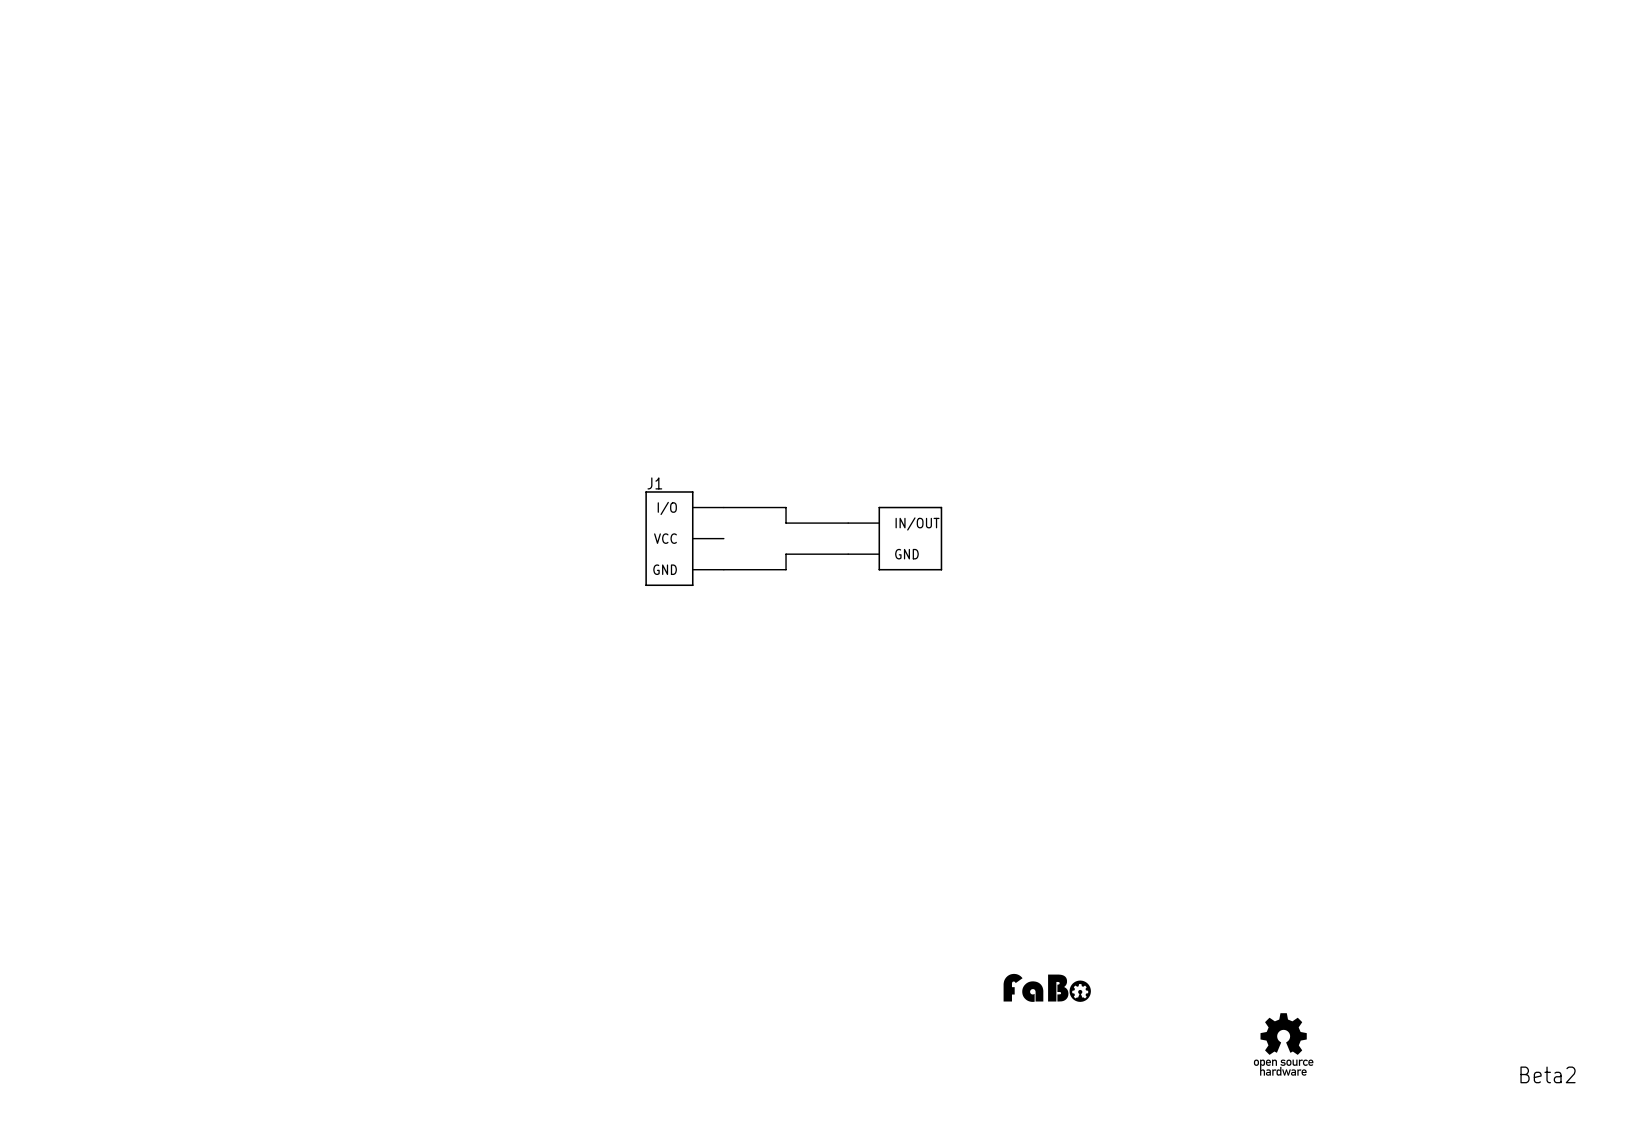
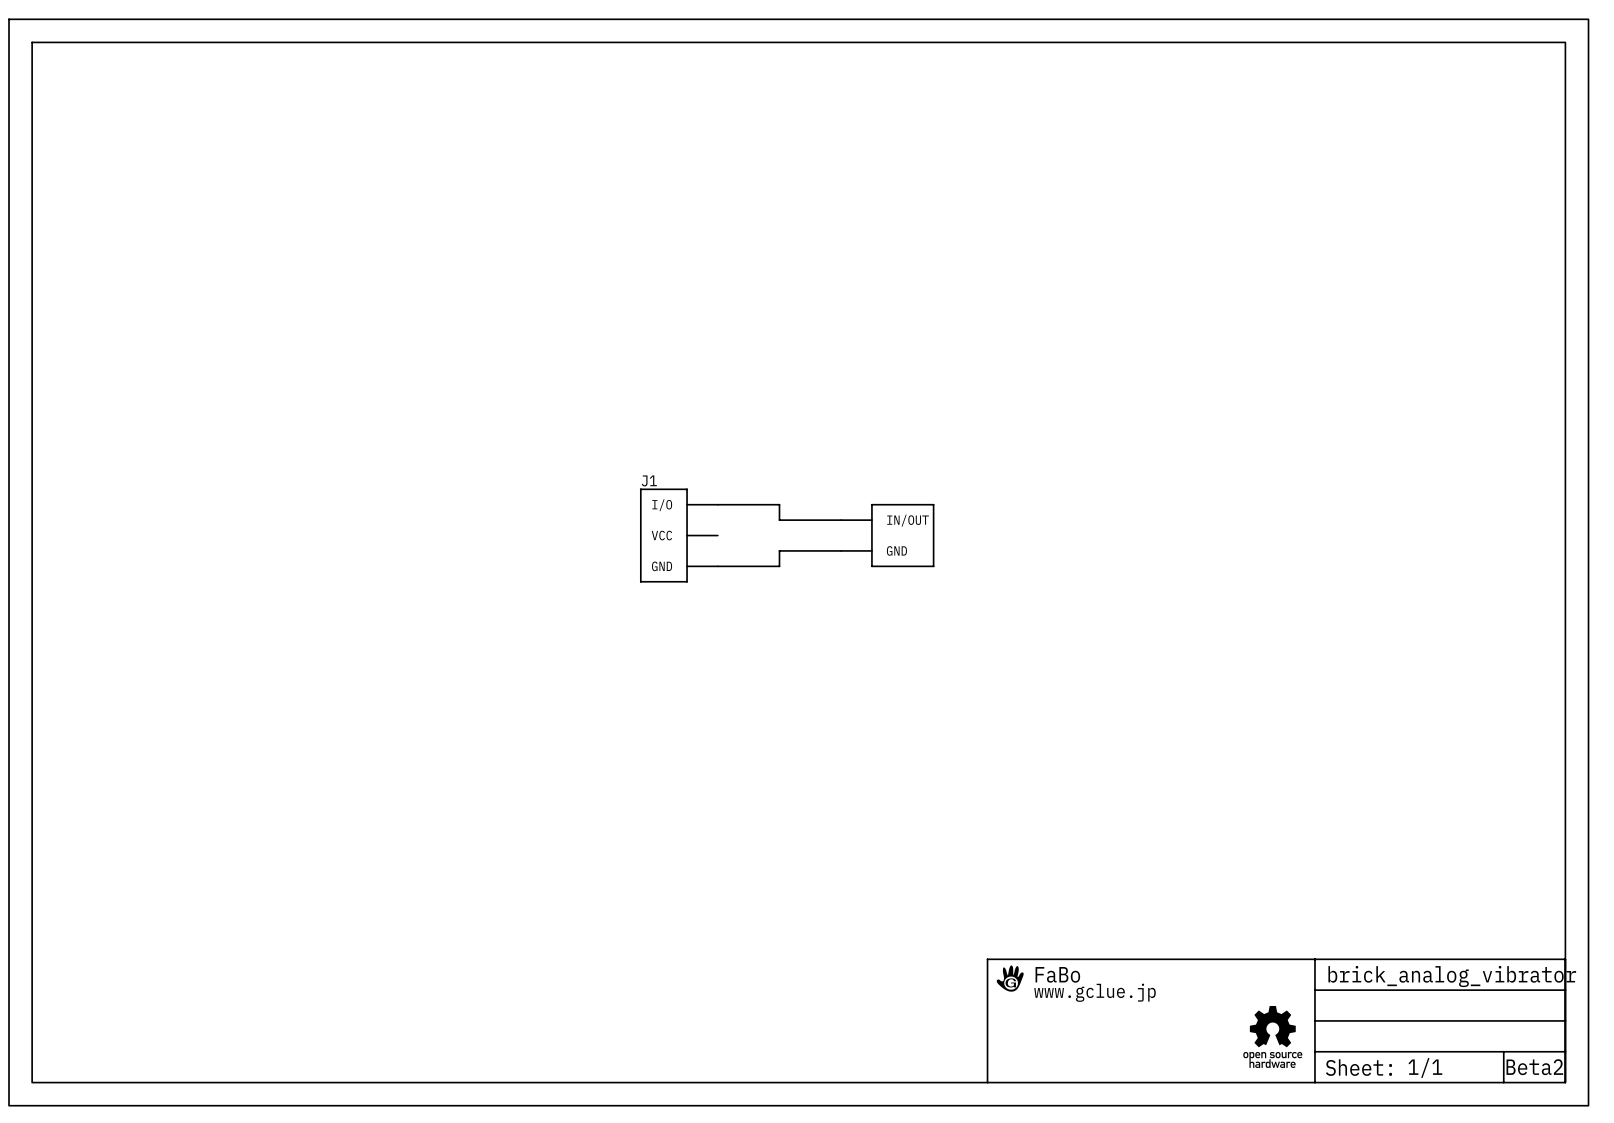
part: none -> (798, 562)
part: (1047, 987) -> none

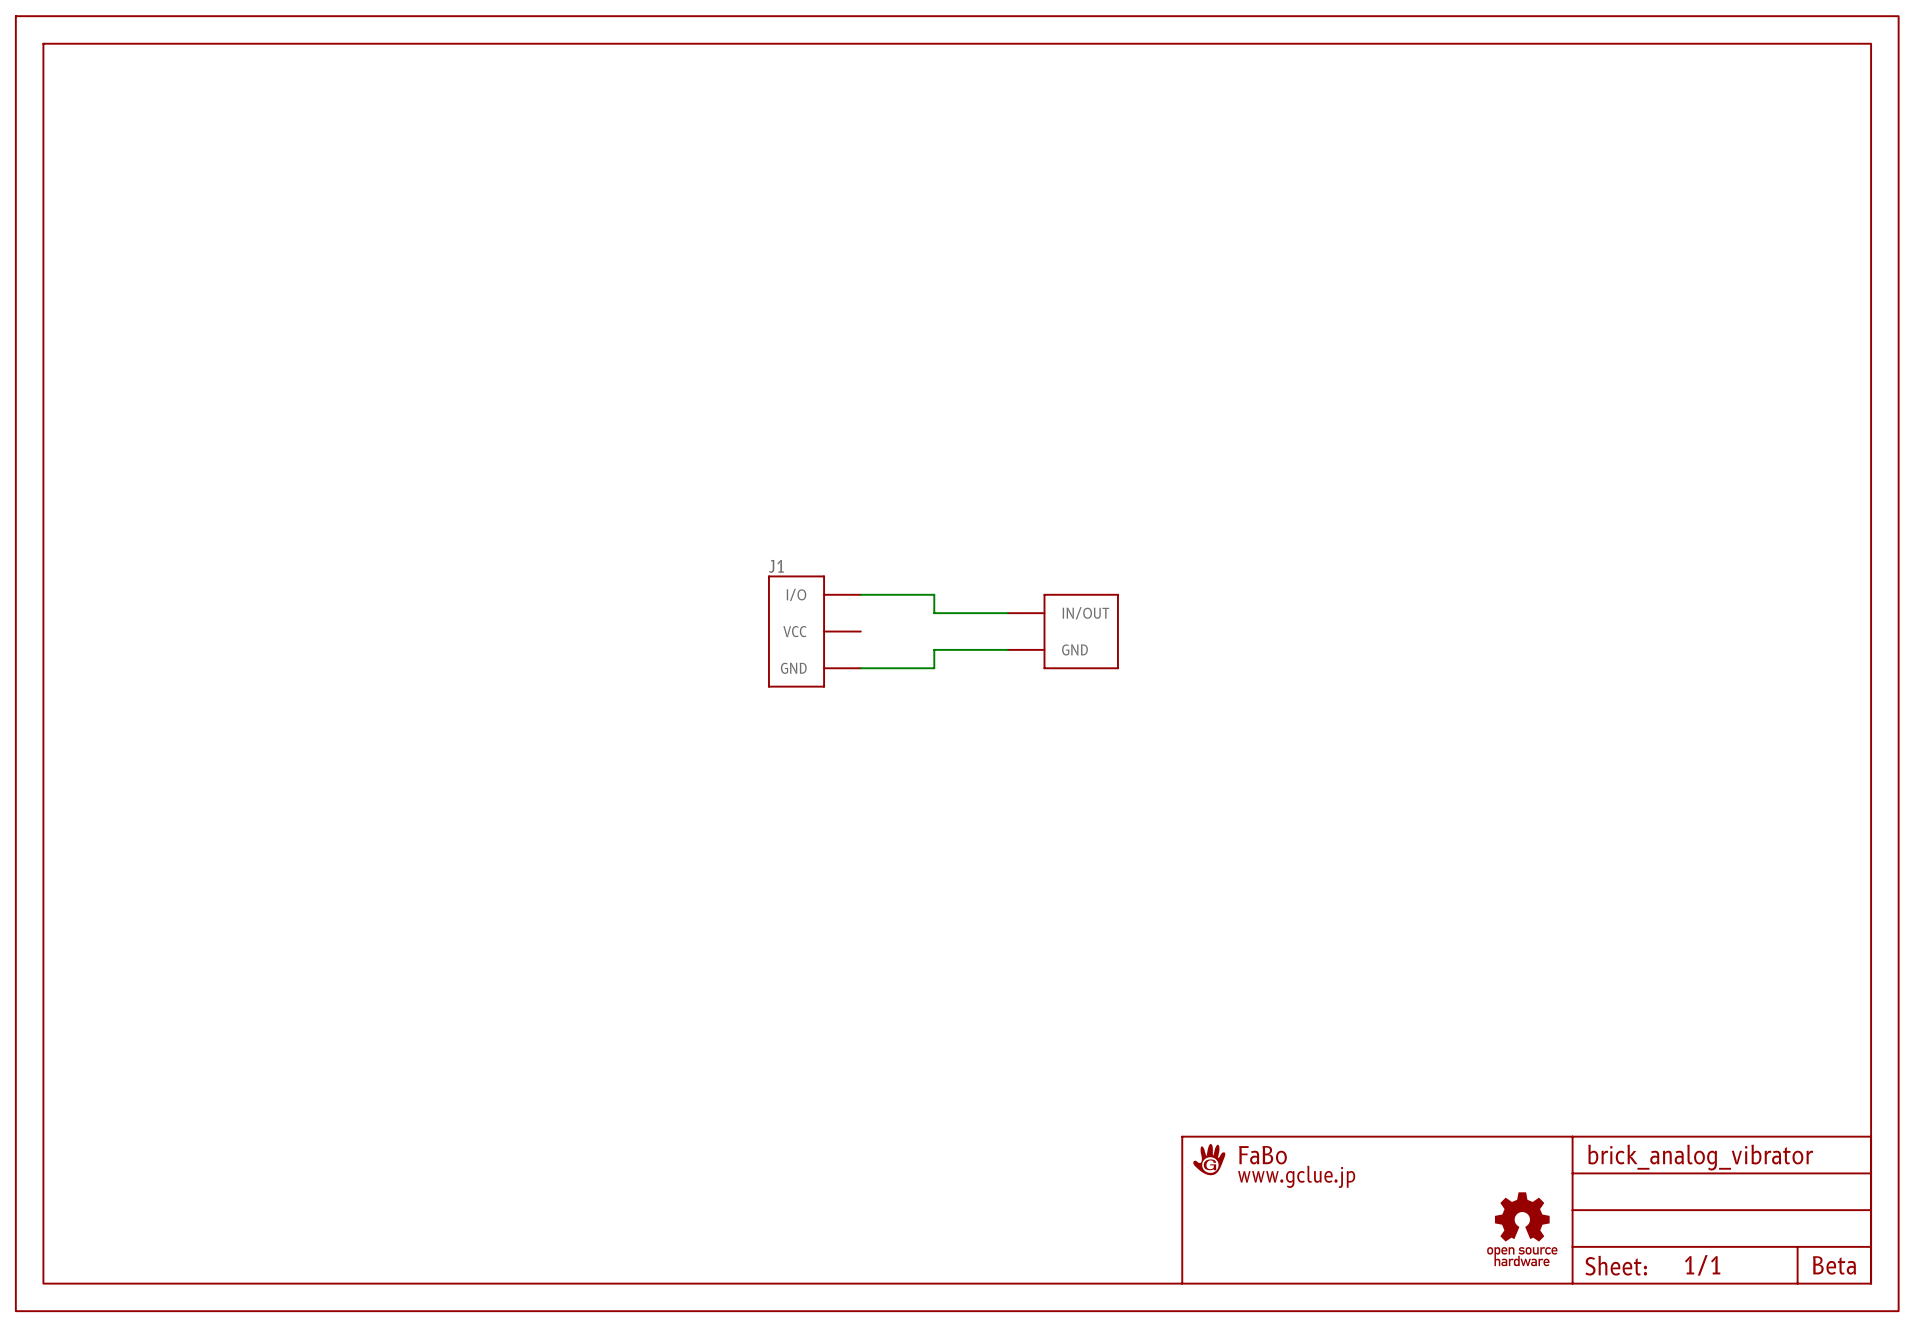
text: Beta2 (1534, 1067) -> Beta (1834, 1265)

